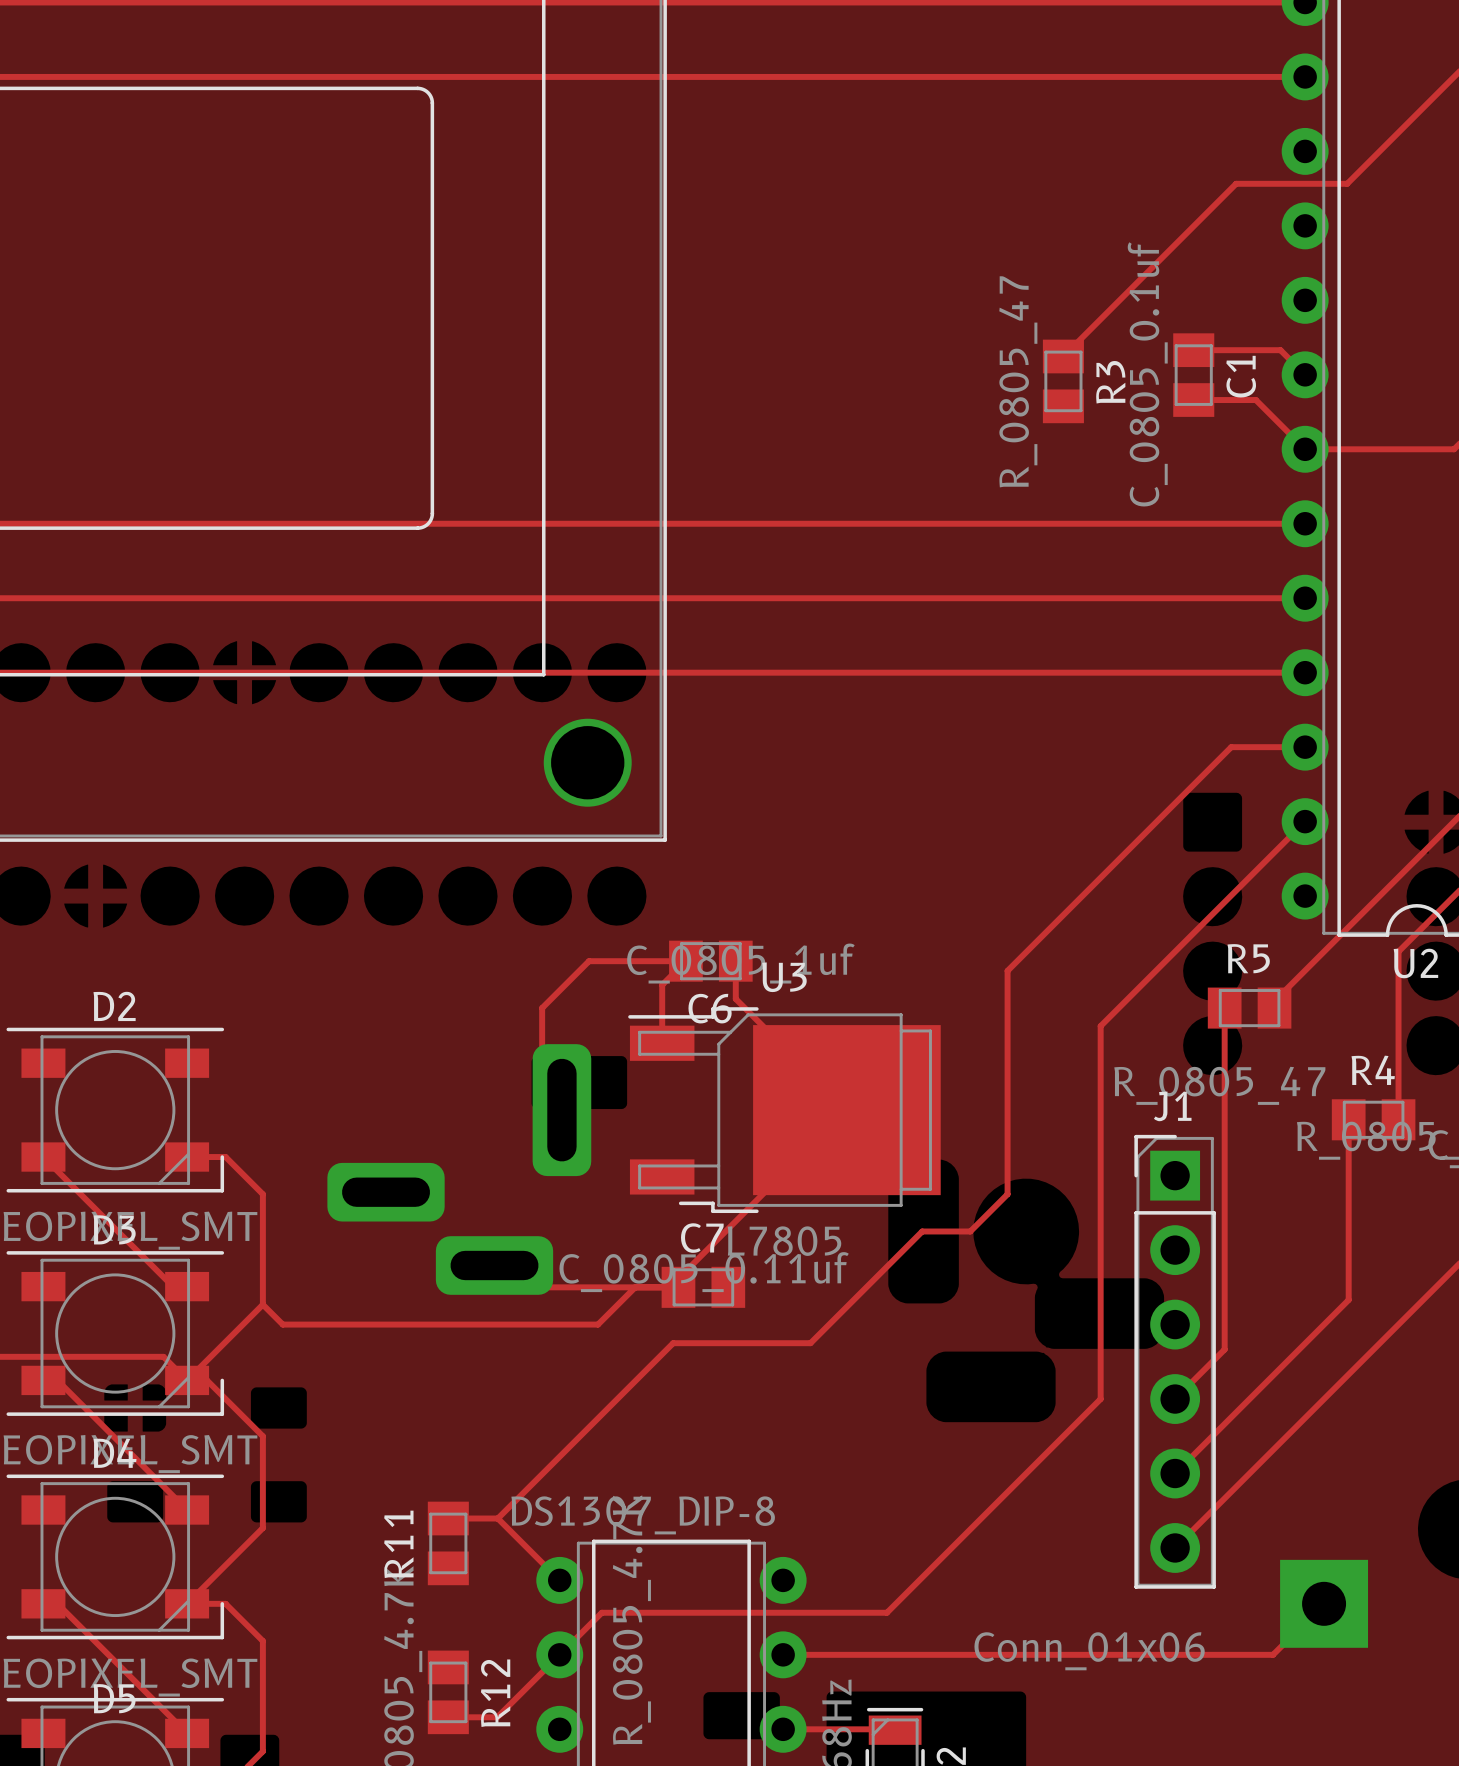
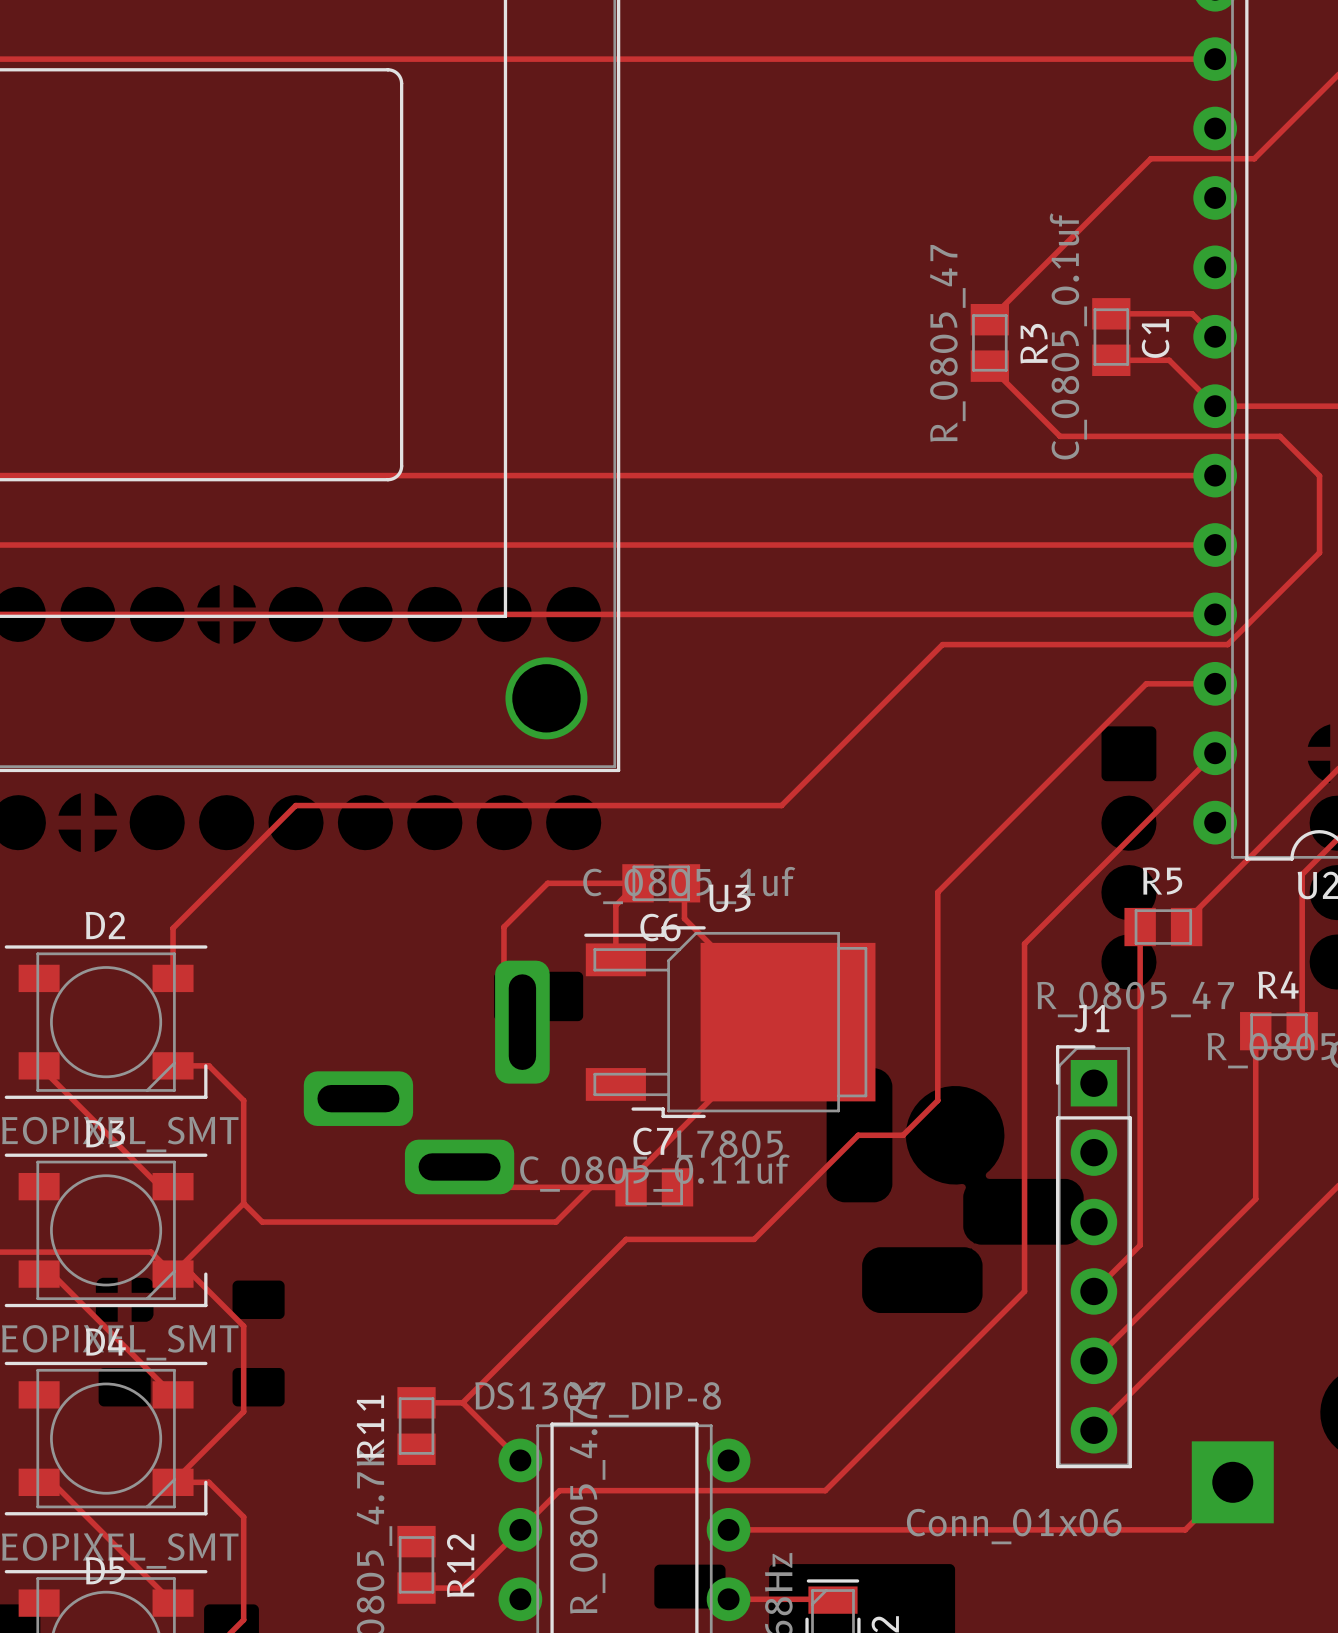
track: none -> (989, 366) (1060, 436) (1280, 436) (1319, 475) (1319, 552) (1227, 644) (942, 644) (781, 805) (295, 805) (173, 928) (173, 978)

